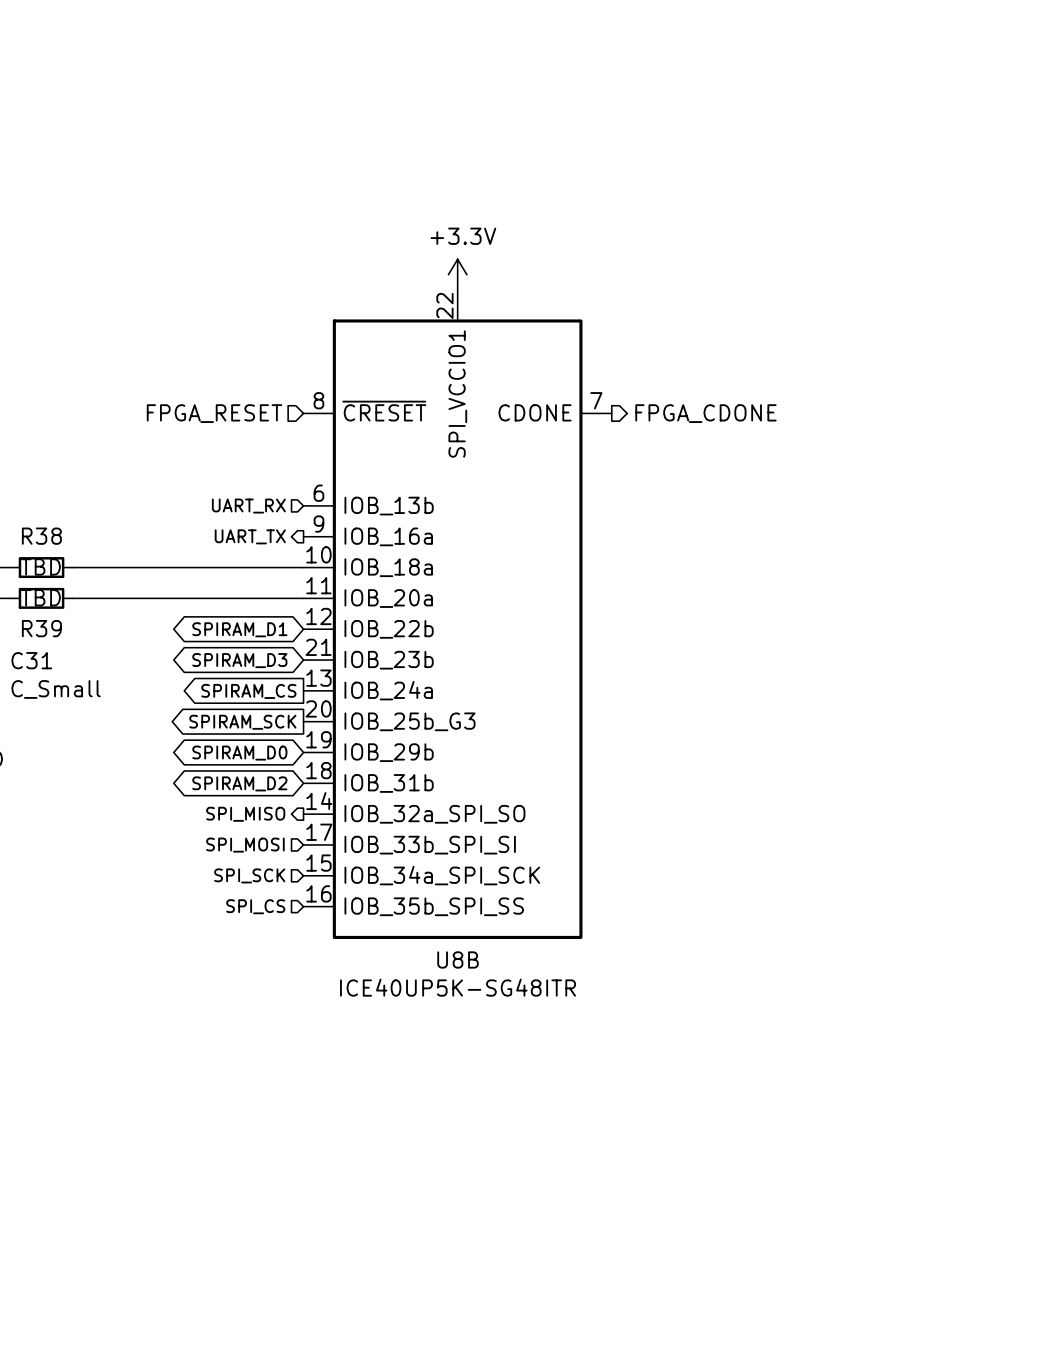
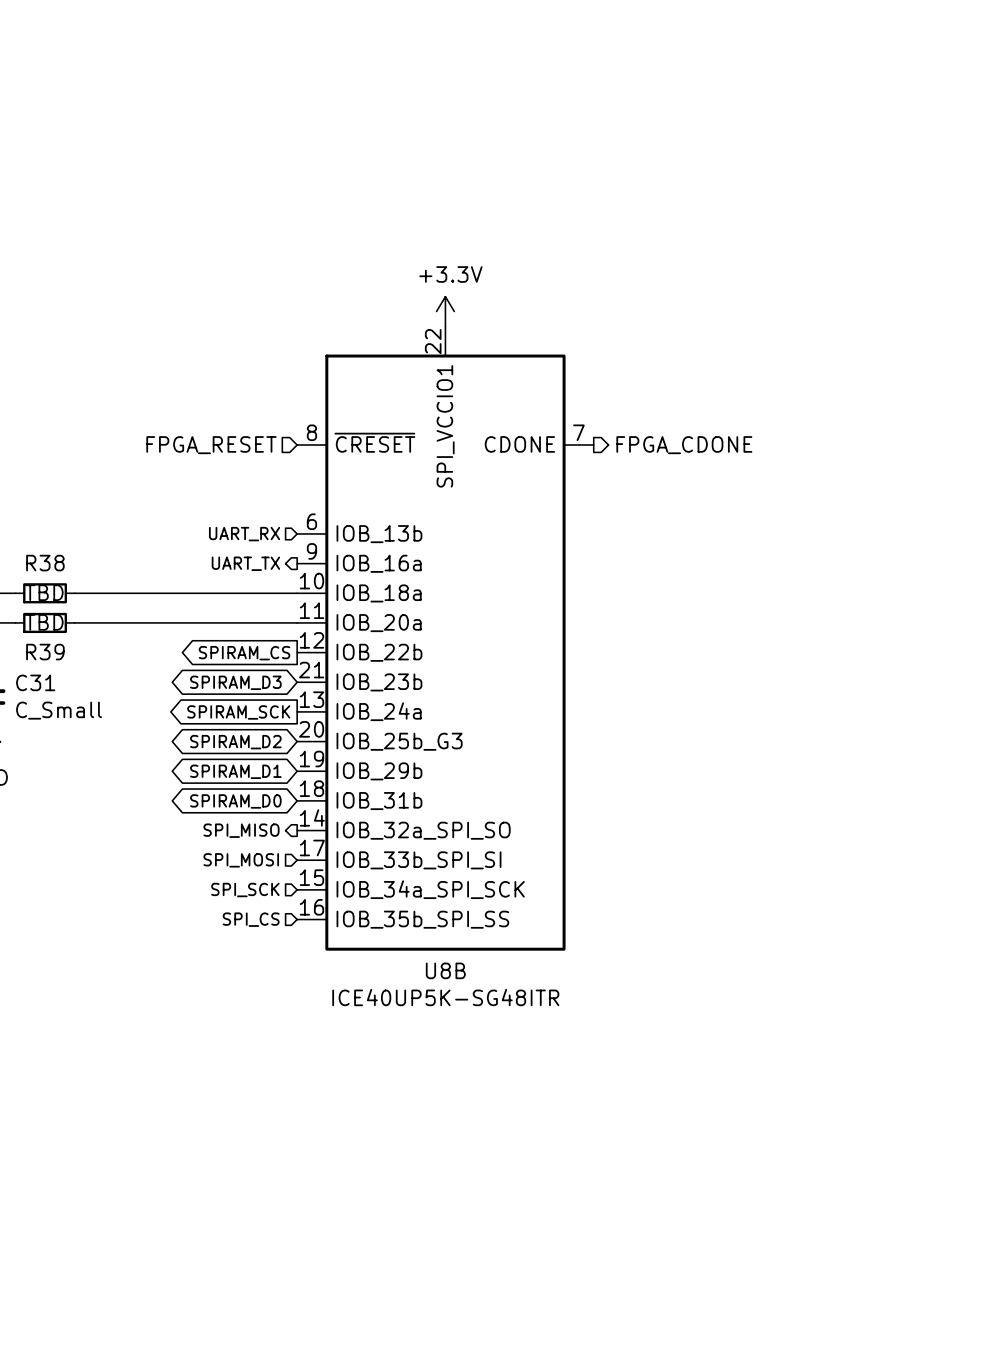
global label shape: bidirectional (239, 629) -> output (244, 653)
global label: SPIRAM_D1 (239, 629) -> SPIRAM_CS (244, 653)
global label: SPIRAM_CS (248, 691) -> SPIRAM_SCK (238, 712)
global label shape: output (242, 722) -> bidirectional (235, 742)
global label: SPIRAM_SCK (242, 722) -> SPIRAM_D2 (235, 742)
global label: SPIRAM_D0 (239, 753) -> SPIRAM_D1 (235, 771)
global label: SPIRAM_D2 (239, 783) -> SPIRAM_D0 (235, 801)

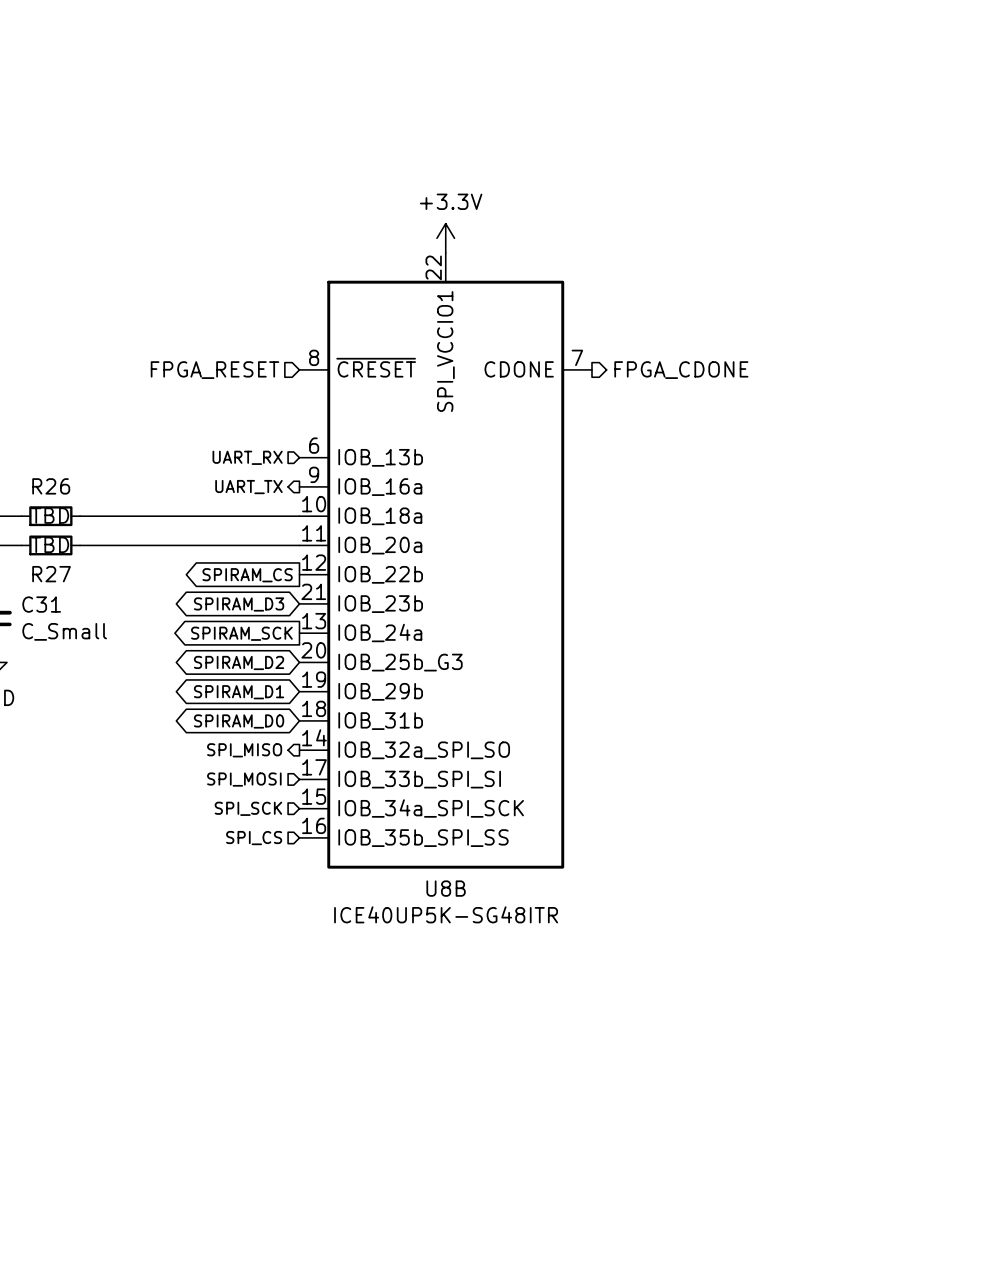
R38 name: R38 (45, 563) -> R26 (51, 486)
R39 name: R39 (45, 652) -> R27 (51, 574)

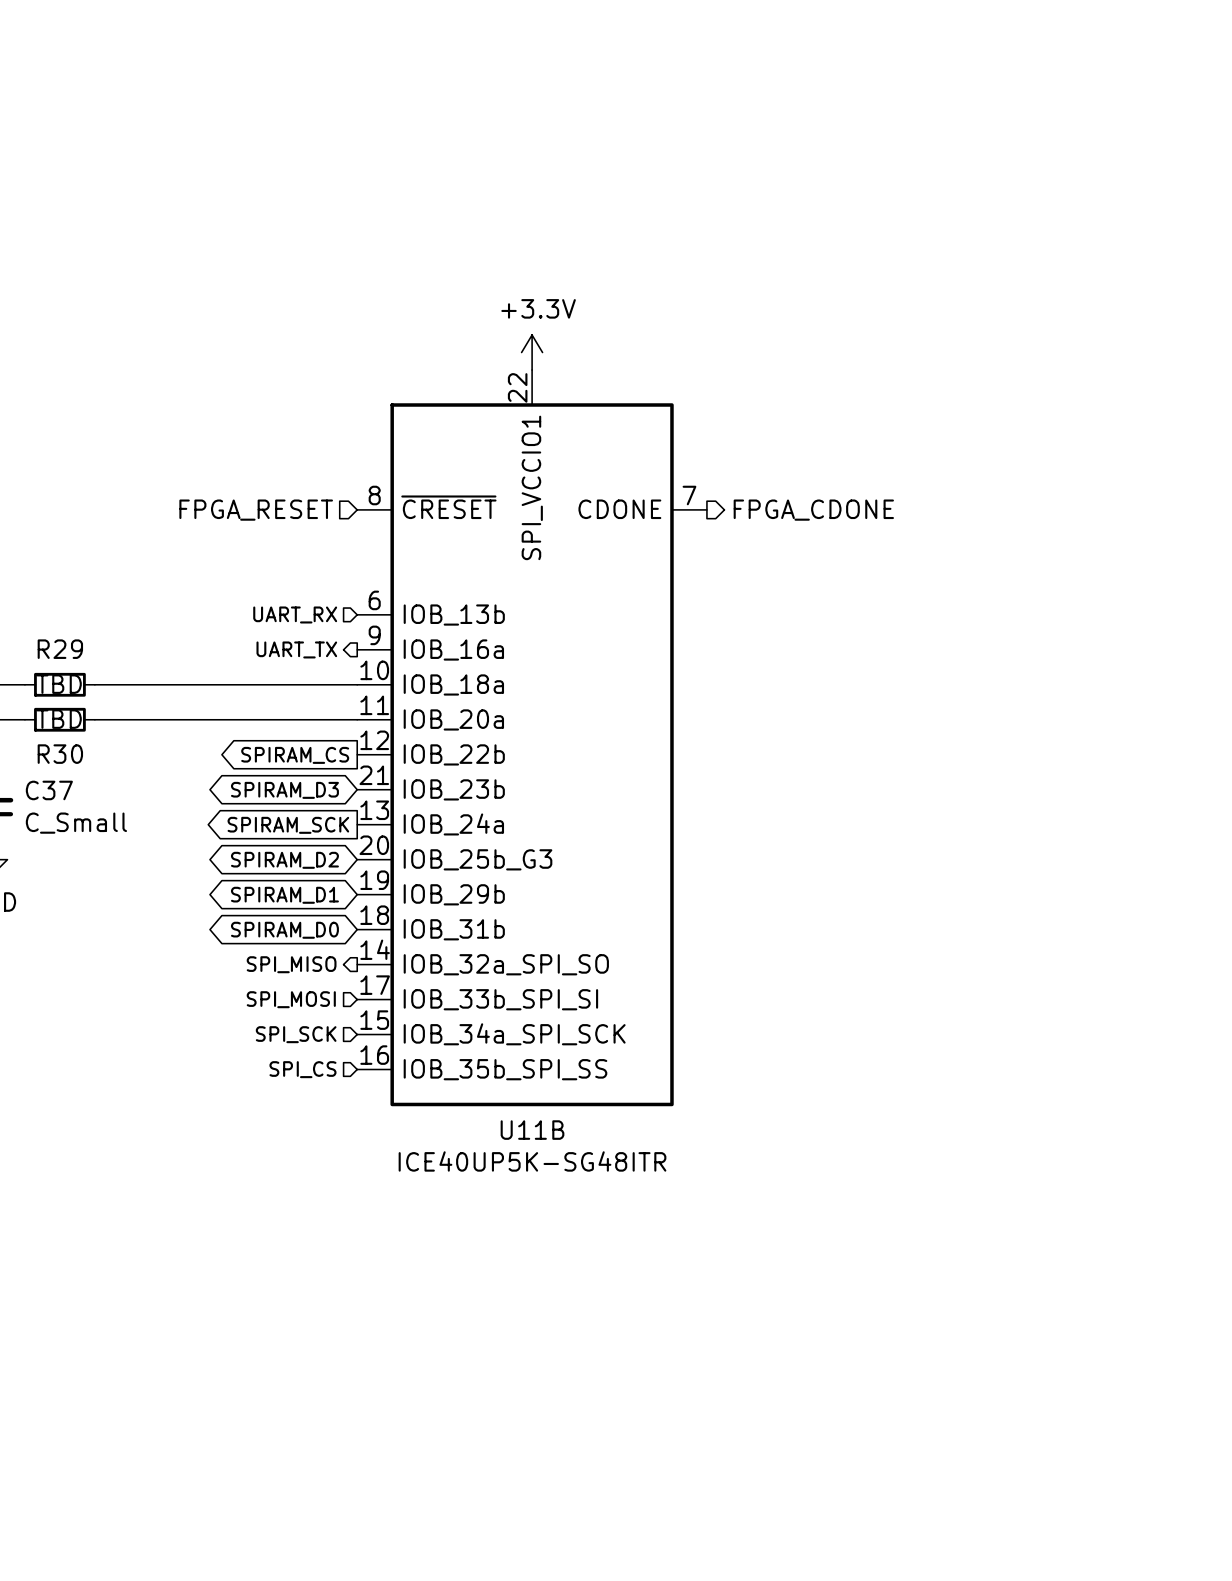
R26 name: R26 (51, 486) -> R29 (60, 649)
R27 name: R27 (51, 574) -> R30 (60, 754)
C31 name: C31 (41, 604) -> C37 (49, 790)
U8B name: U8B (446, 888) -> U11B (532, 1130)

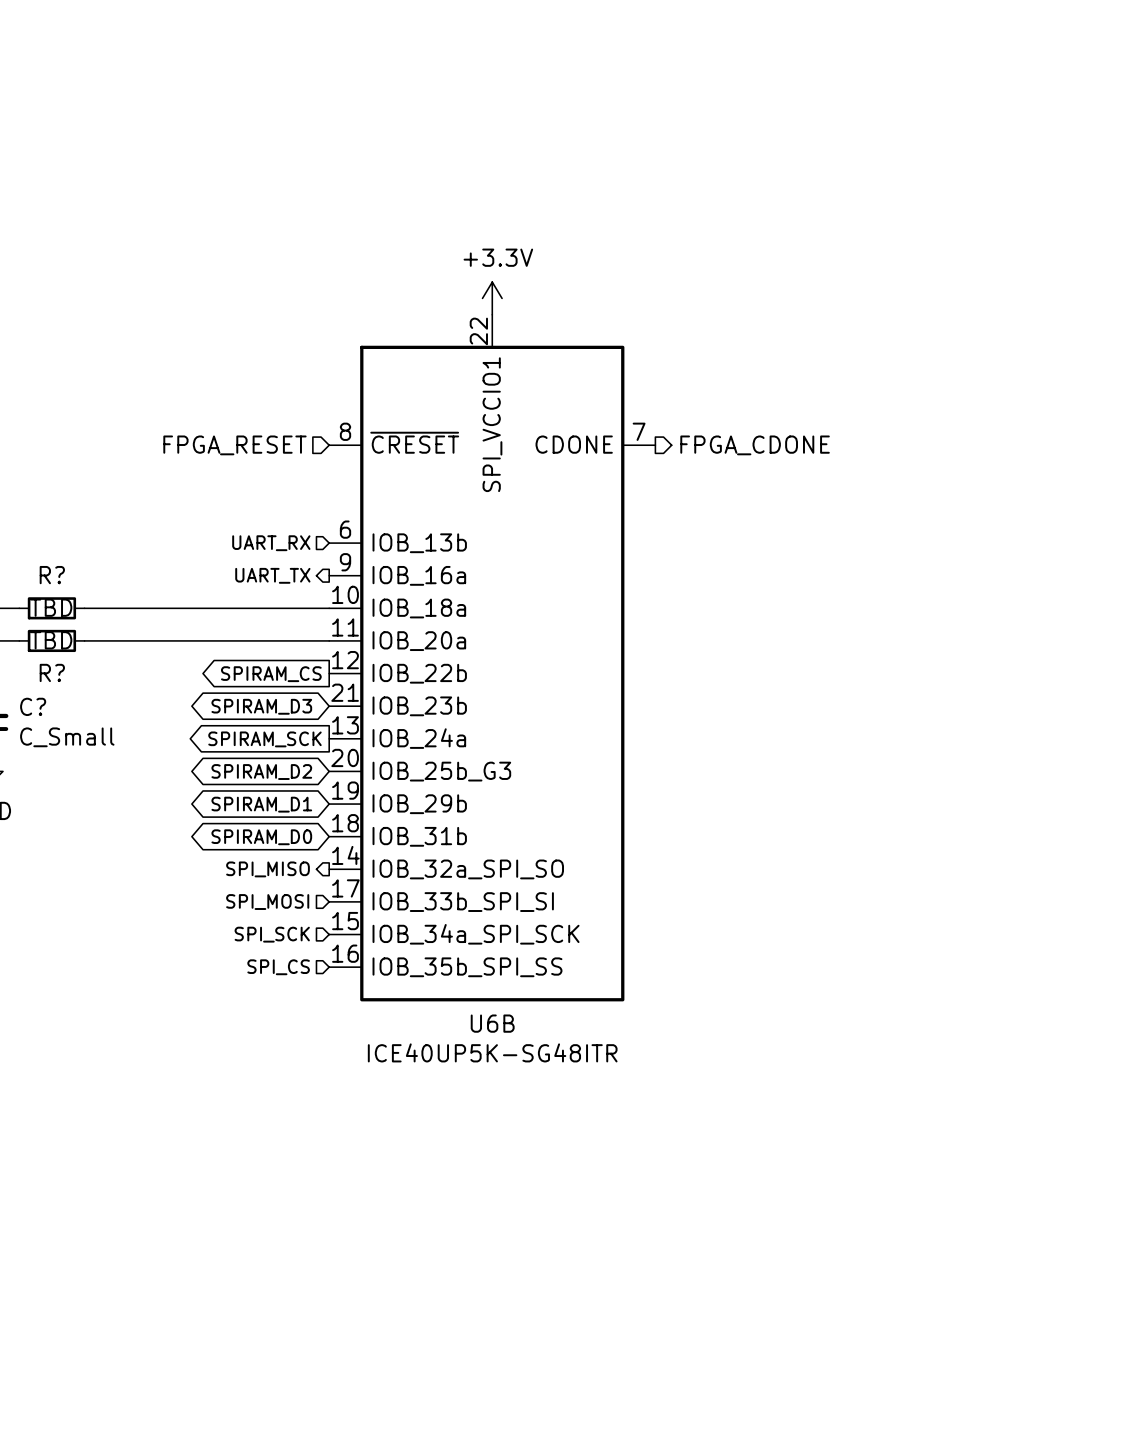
R29 name: R29 (60, 649) -> R? (52, 575)
R30 name: R30 (60, 754) -> R? (52, 672)
C37 name: C37 (49, 790) -> C? (33, 706)
U11B name: U11B (532, 1130) -> U6B (492, 1023)

